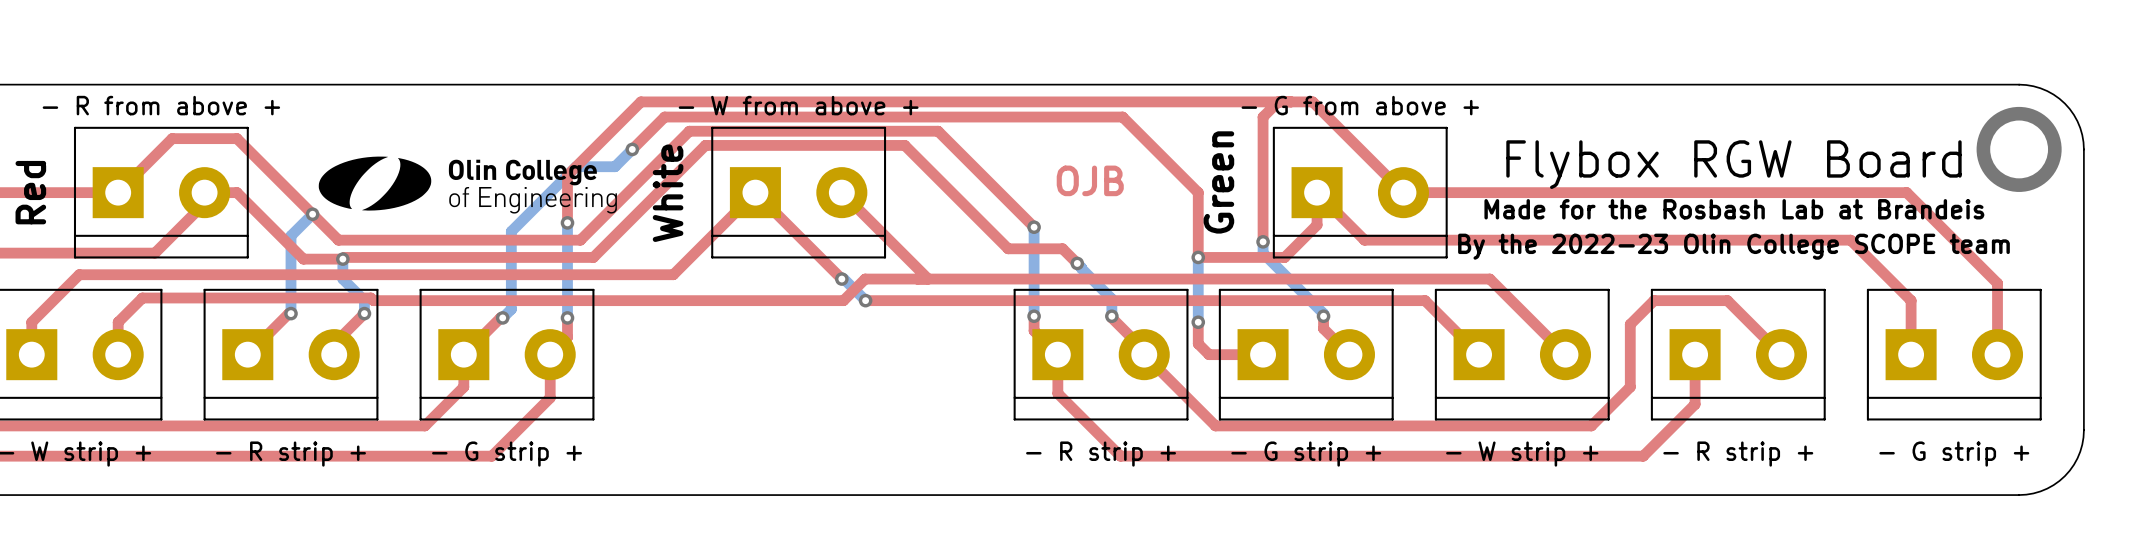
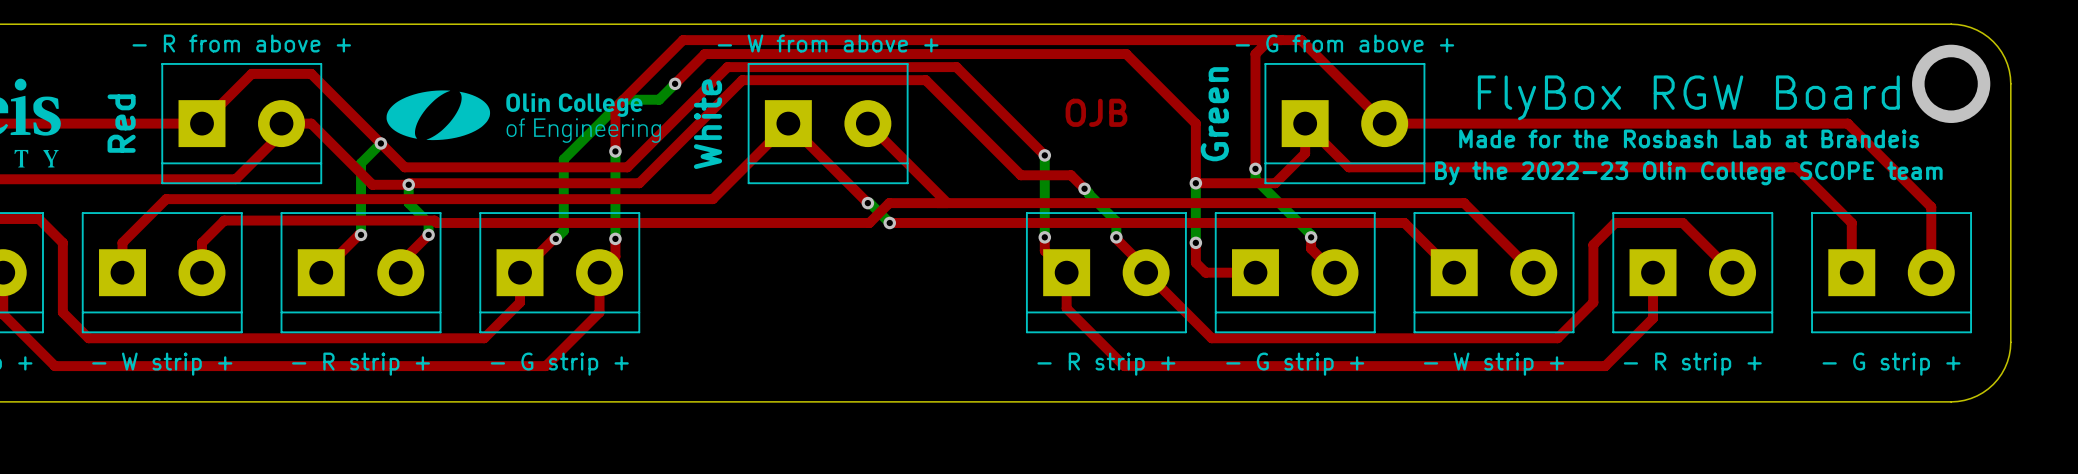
text: Flybox RGW Board (1733, 164) -> FlyBox RGW Board (1688, 97)

